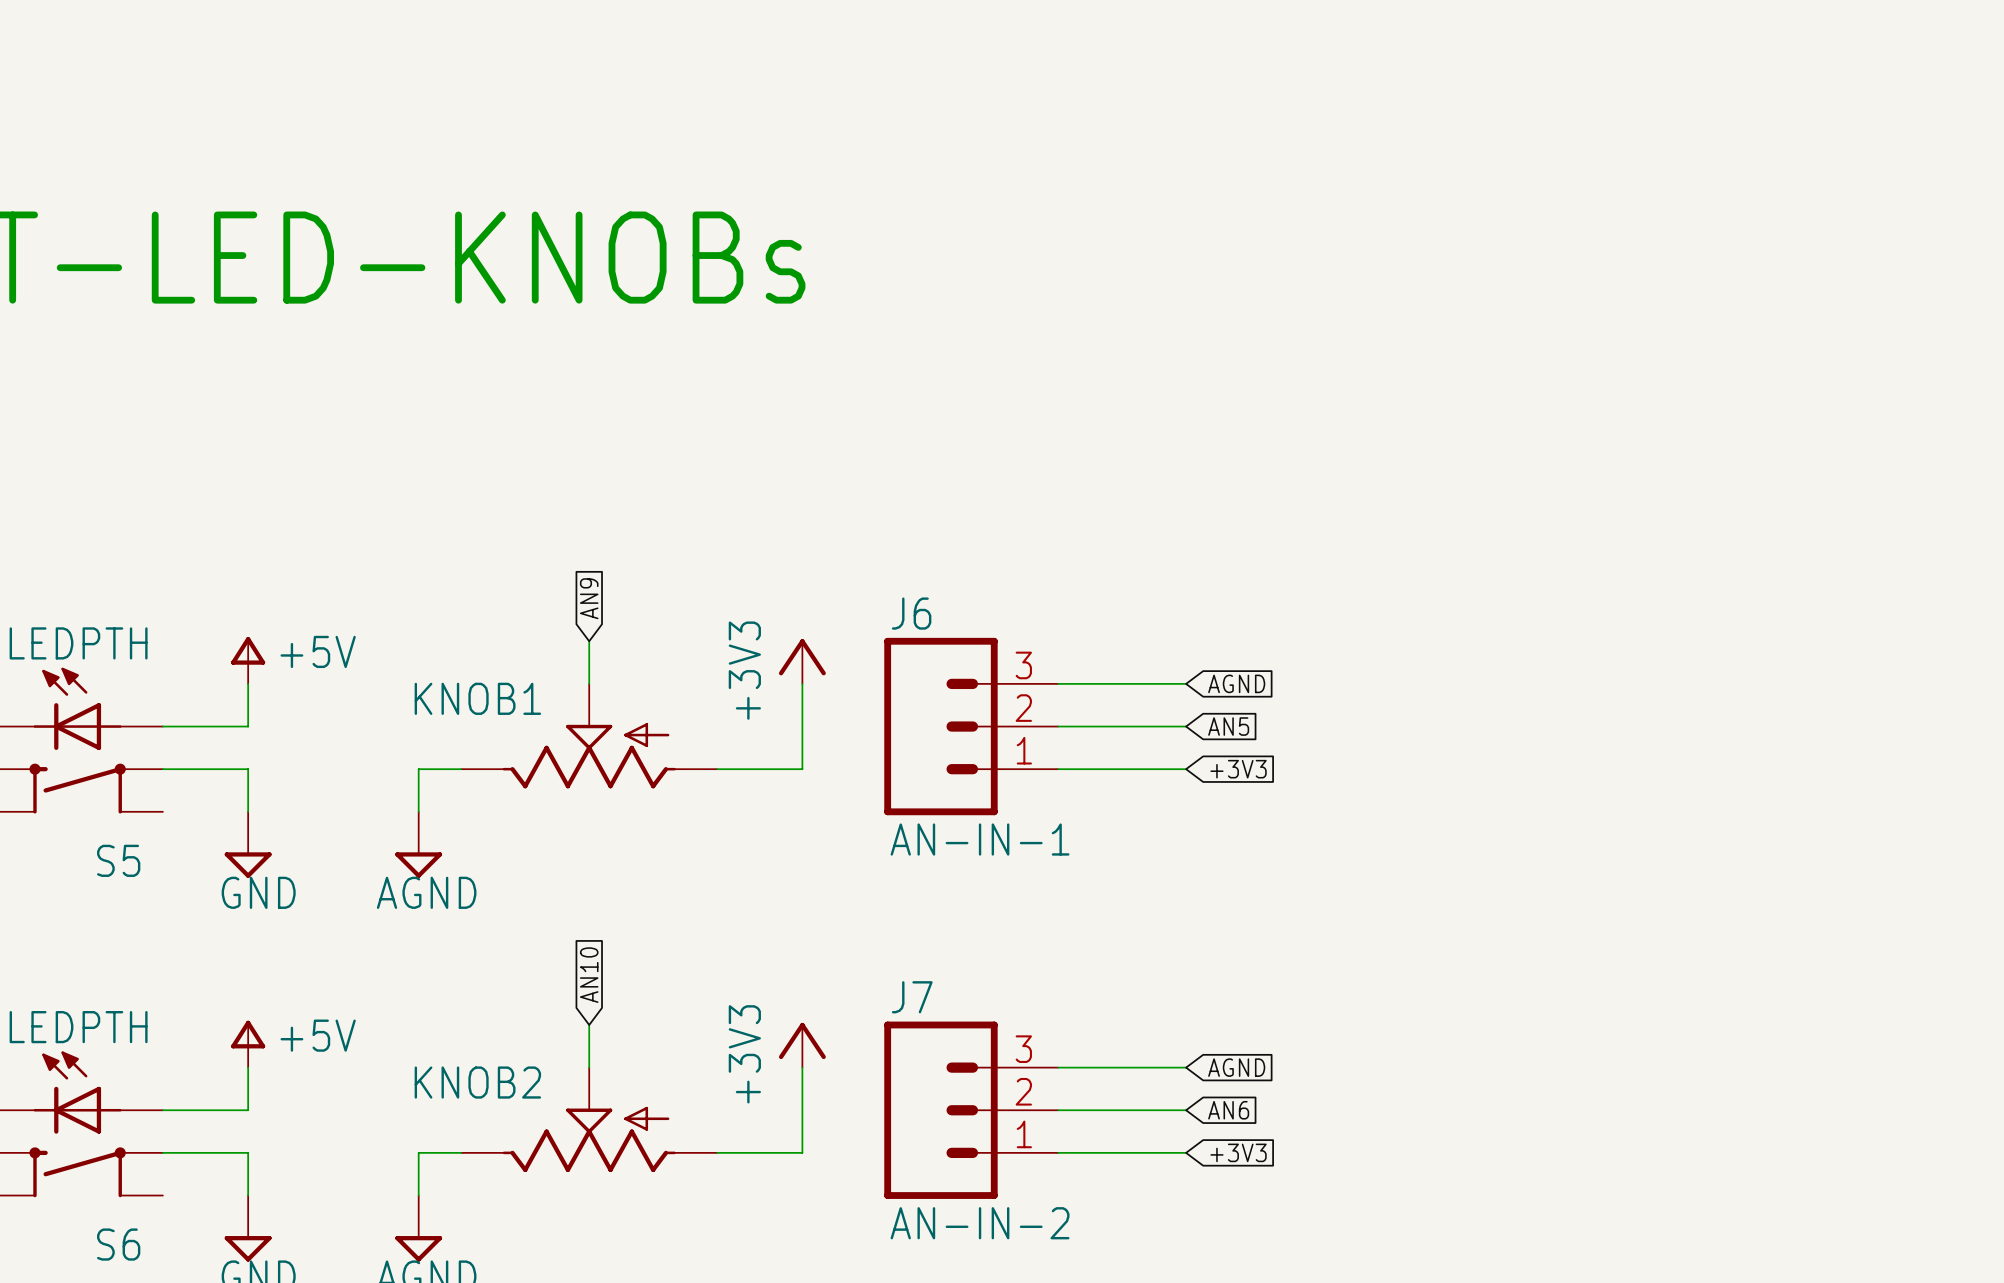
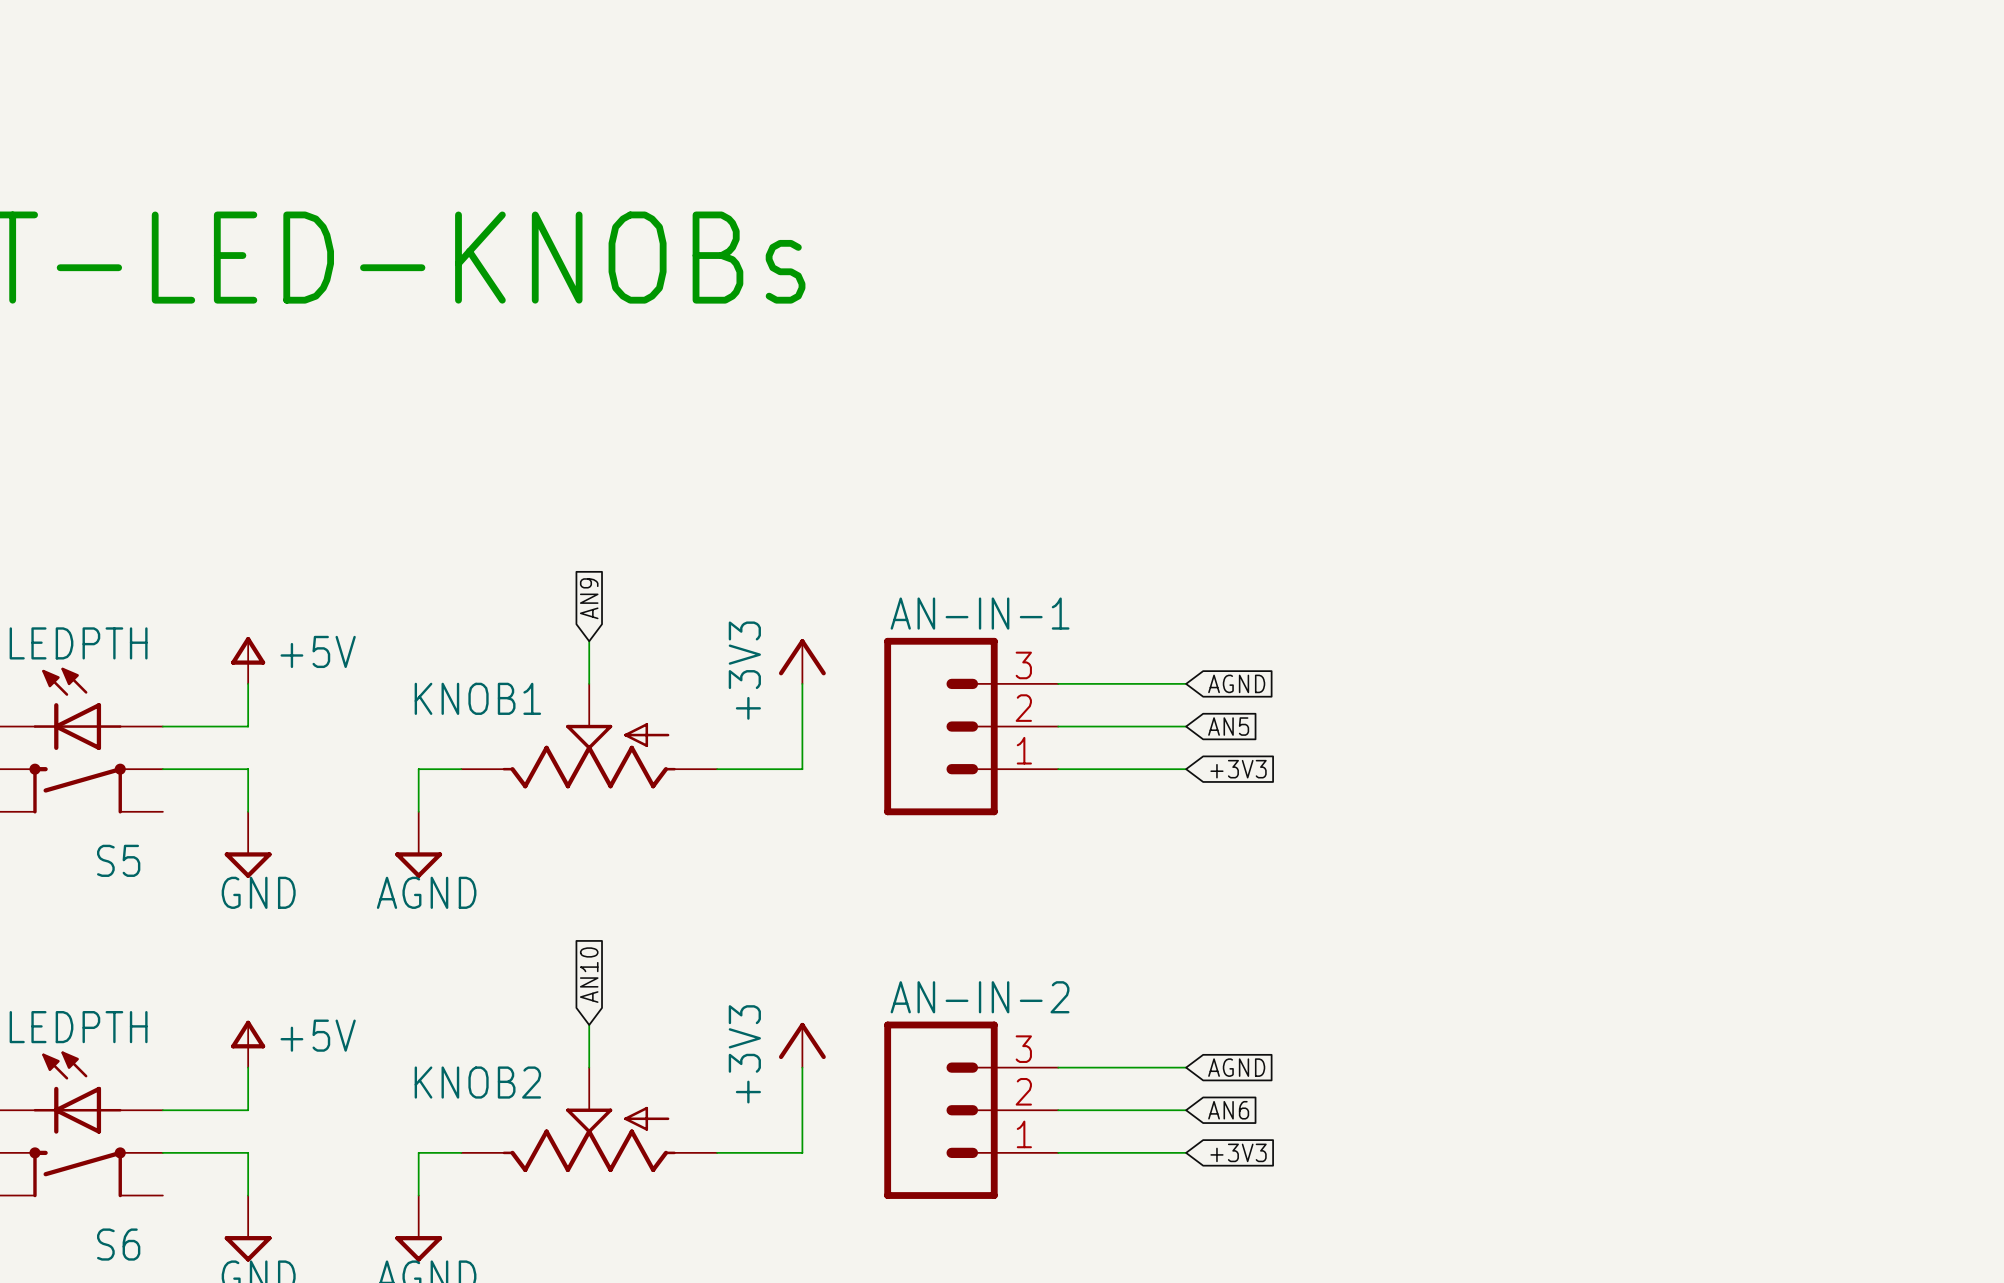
J6 name: J6 (911, 613) -> AN-IN-1 (980, 613)
J6 value: AN-IN-1 (980, 839) -> none
J7 name: J7 (912, 997) -> AN-IN-2 (980, 997)
J7 value: AN-IN-2 (980, 1223) -> none

